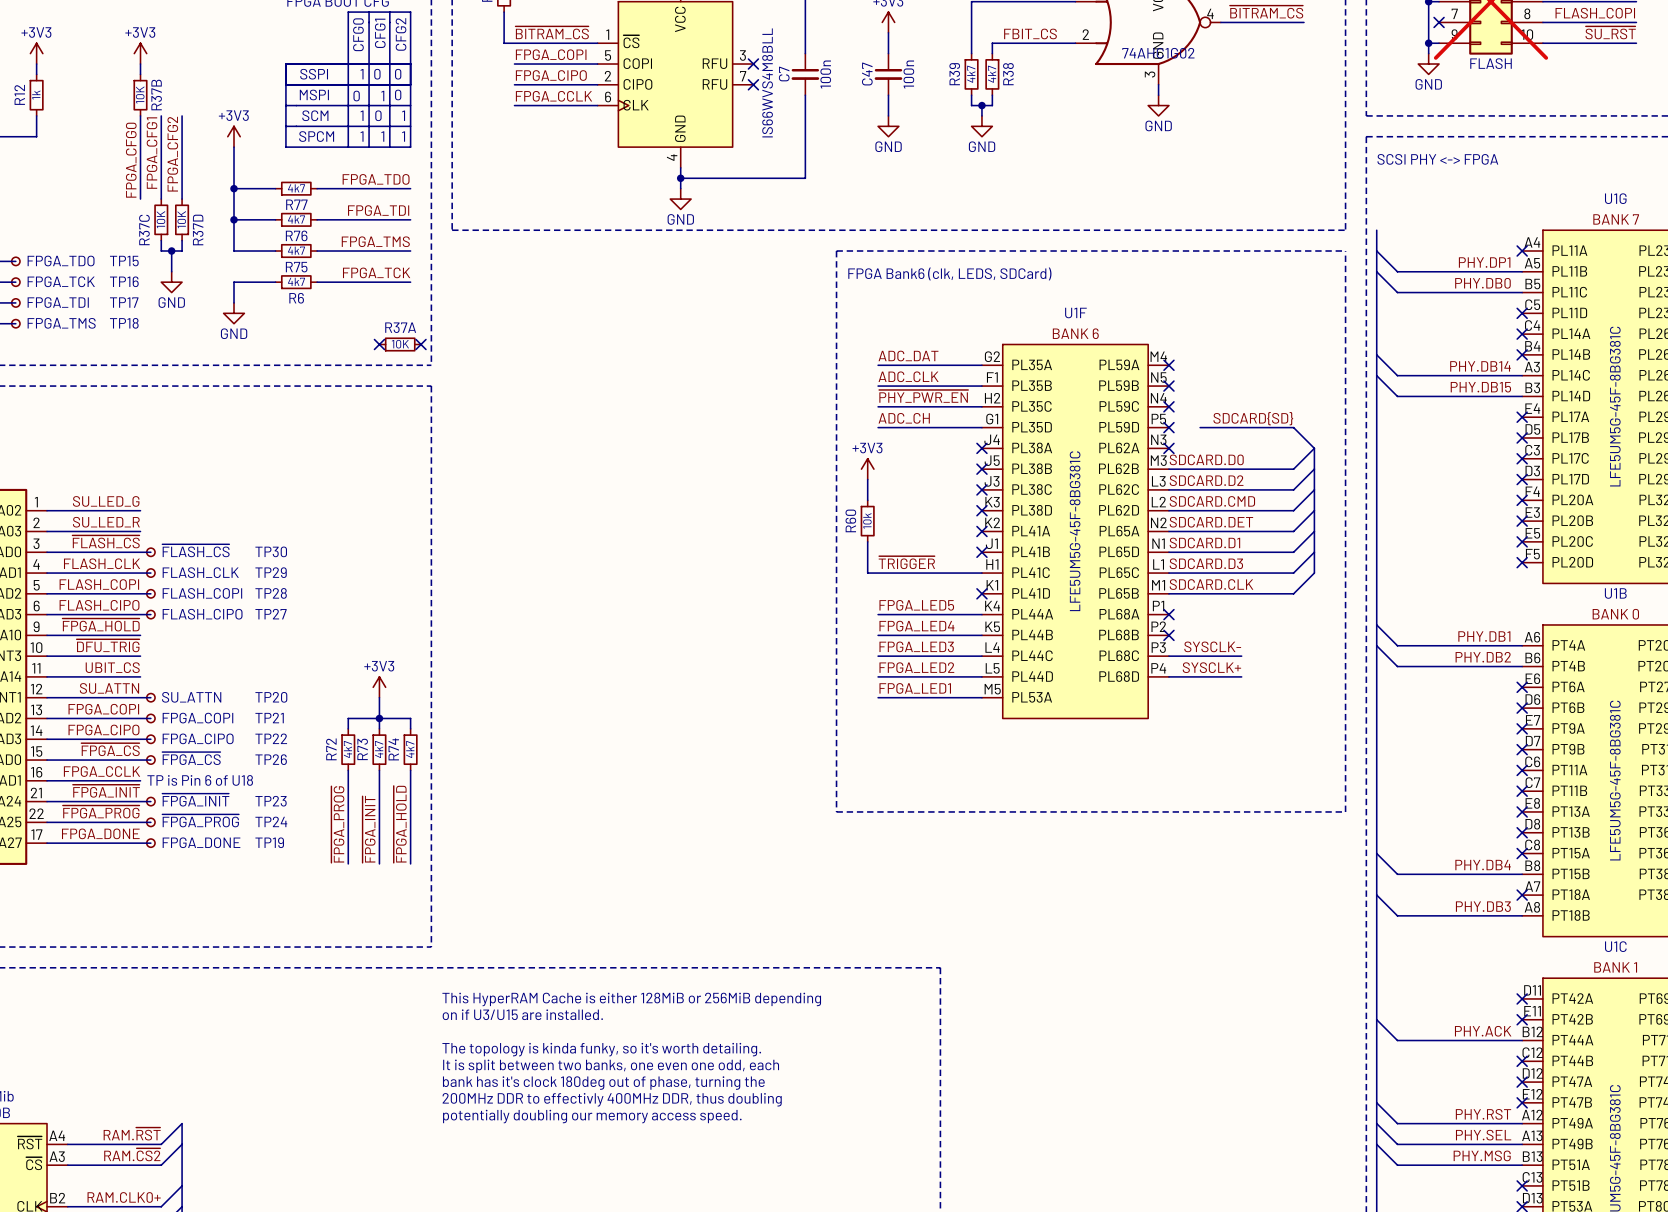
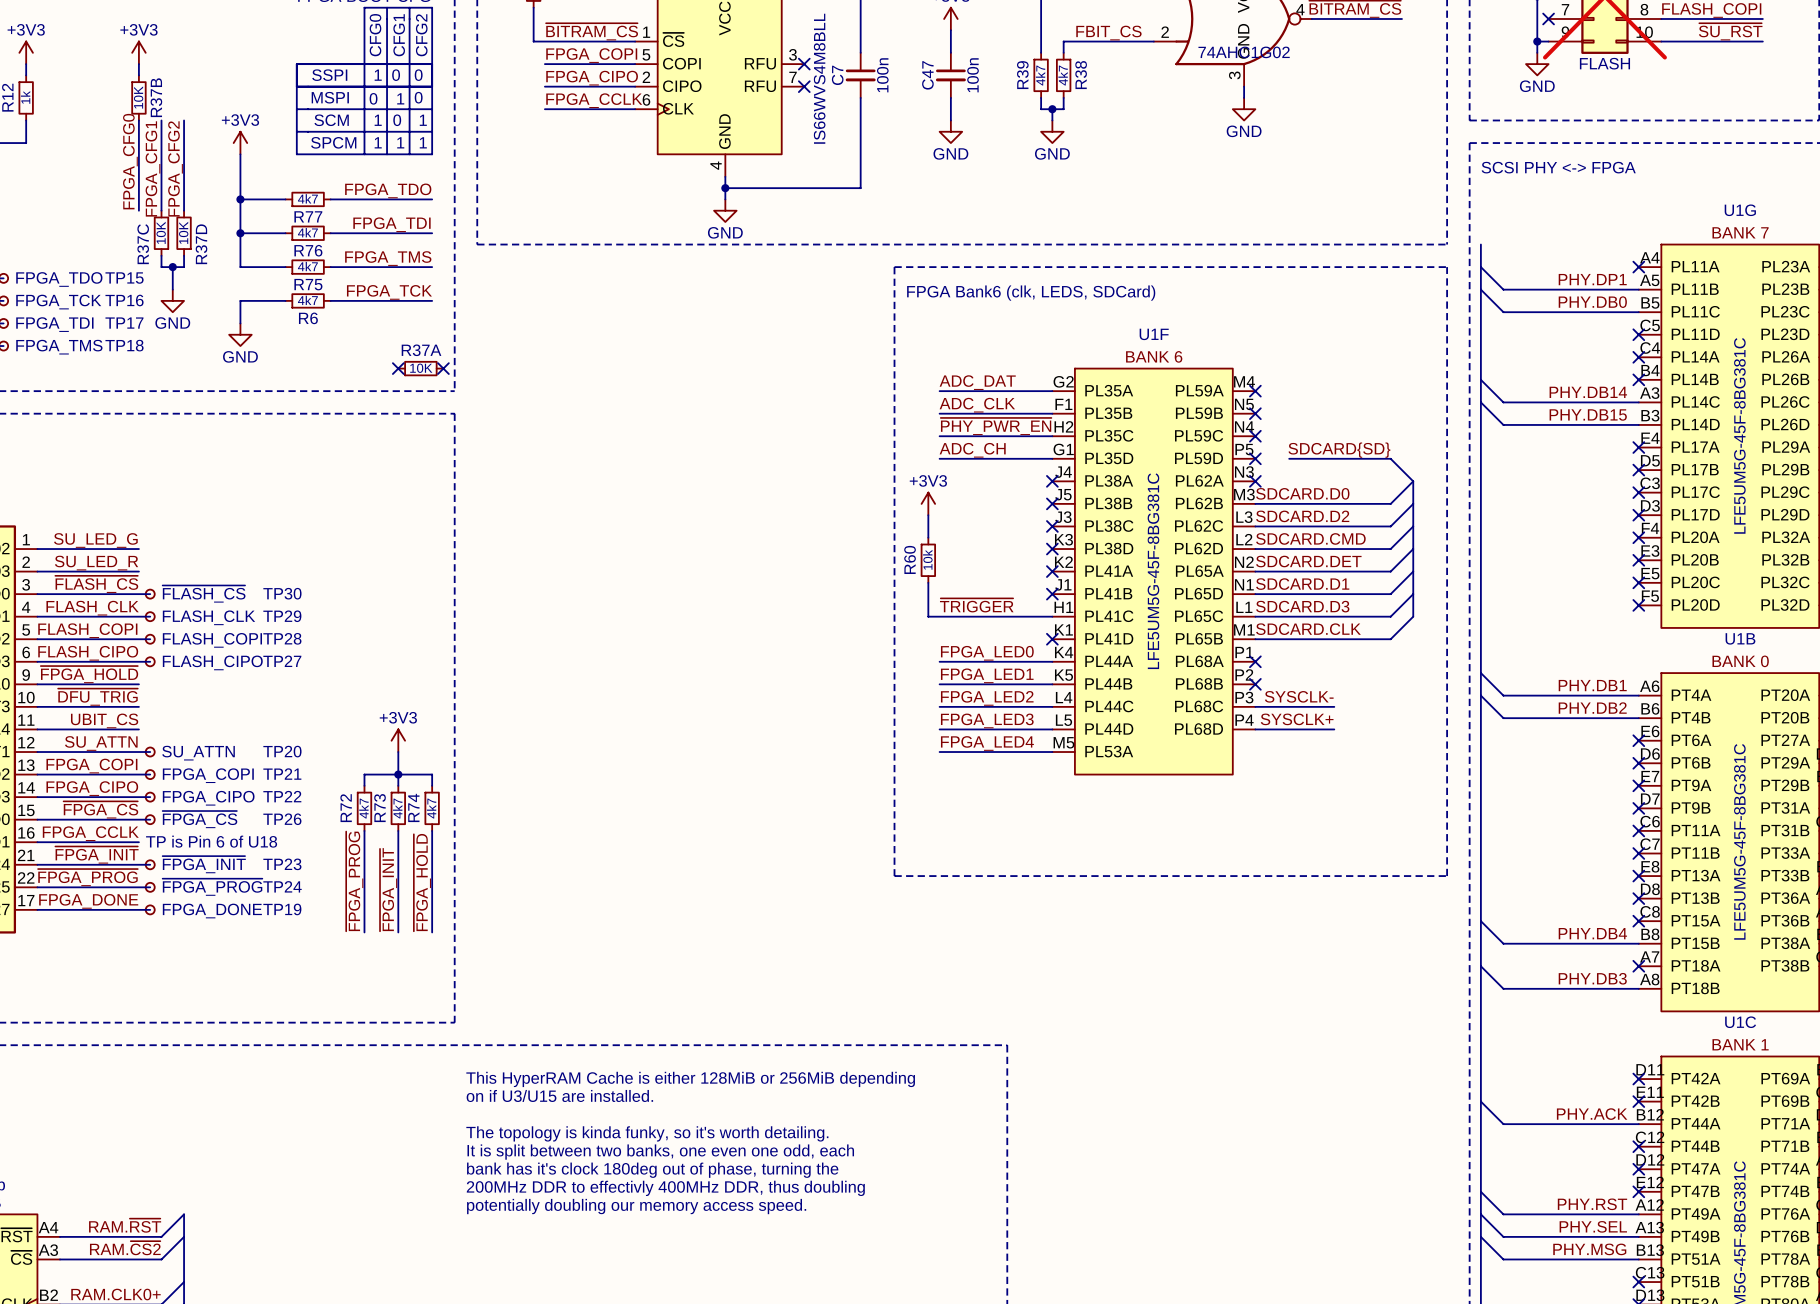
label: FPGA_LED5 (916, 605) -> FPGA_LED0 (987, 653)
label: FPGA_LED4 (916, 626) -> FPGA_LED1 (987, 675)
label: FPGA_LED3 (916, 646) -> FPGA_LED2 (987, 698)
label: FPGA_LED2 (916, 667) -> FPGA_LED3 (987, 720)
label: FPGA_LED1 (915, 688) -> FPGA_LED4 (987, 743)

